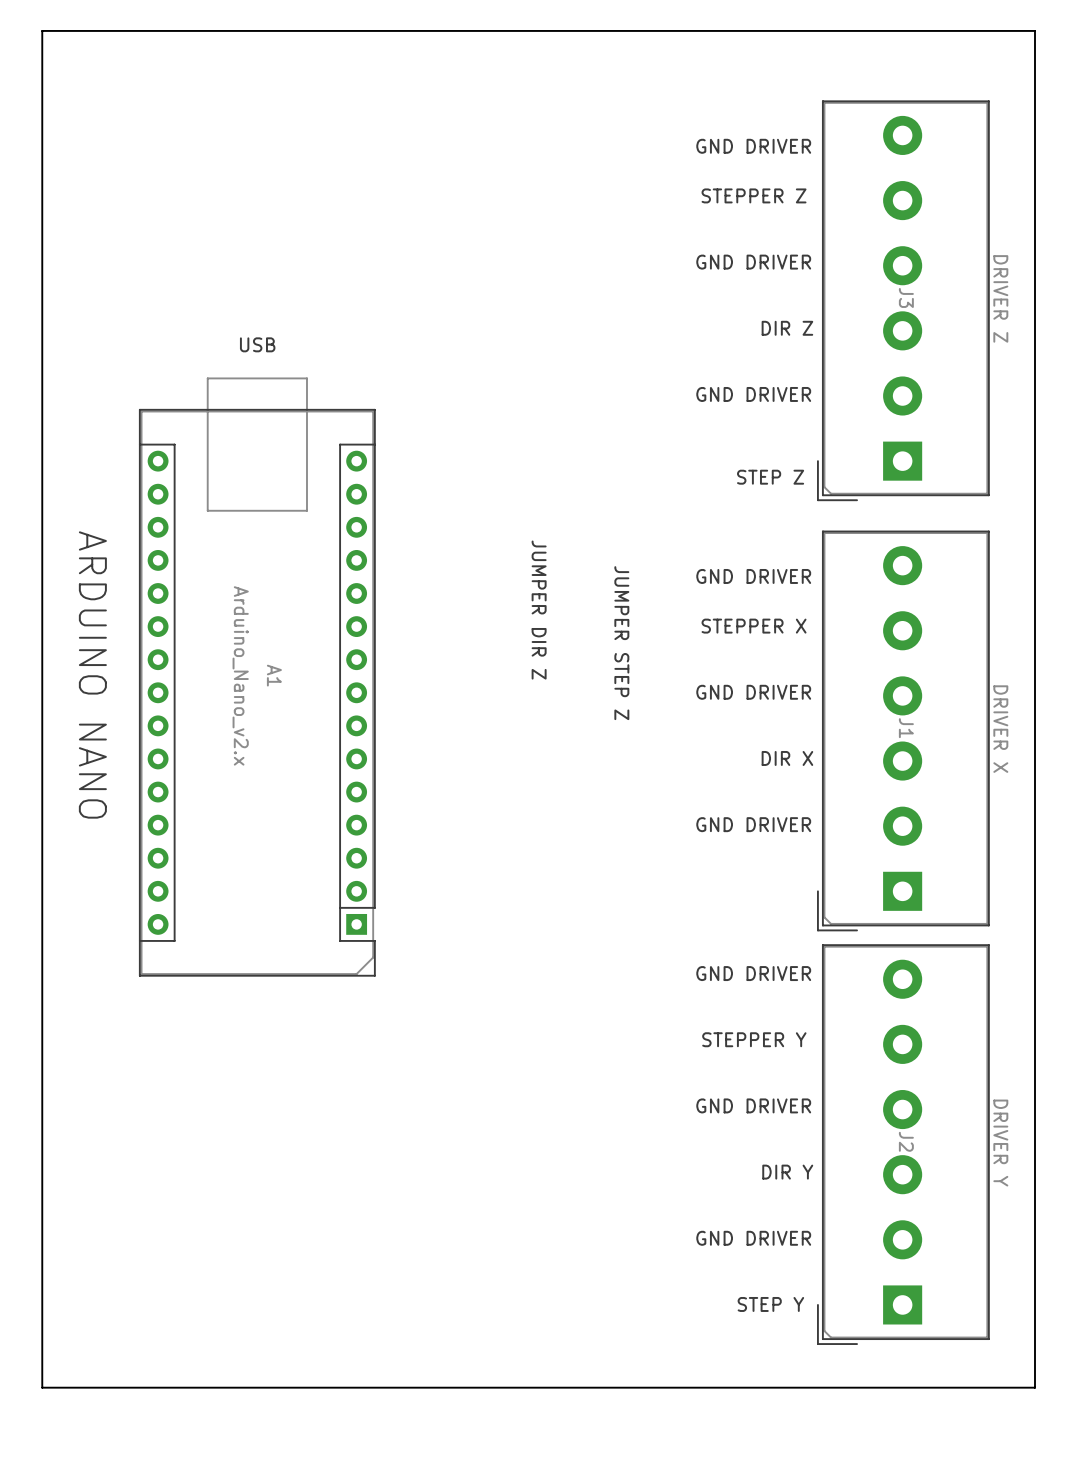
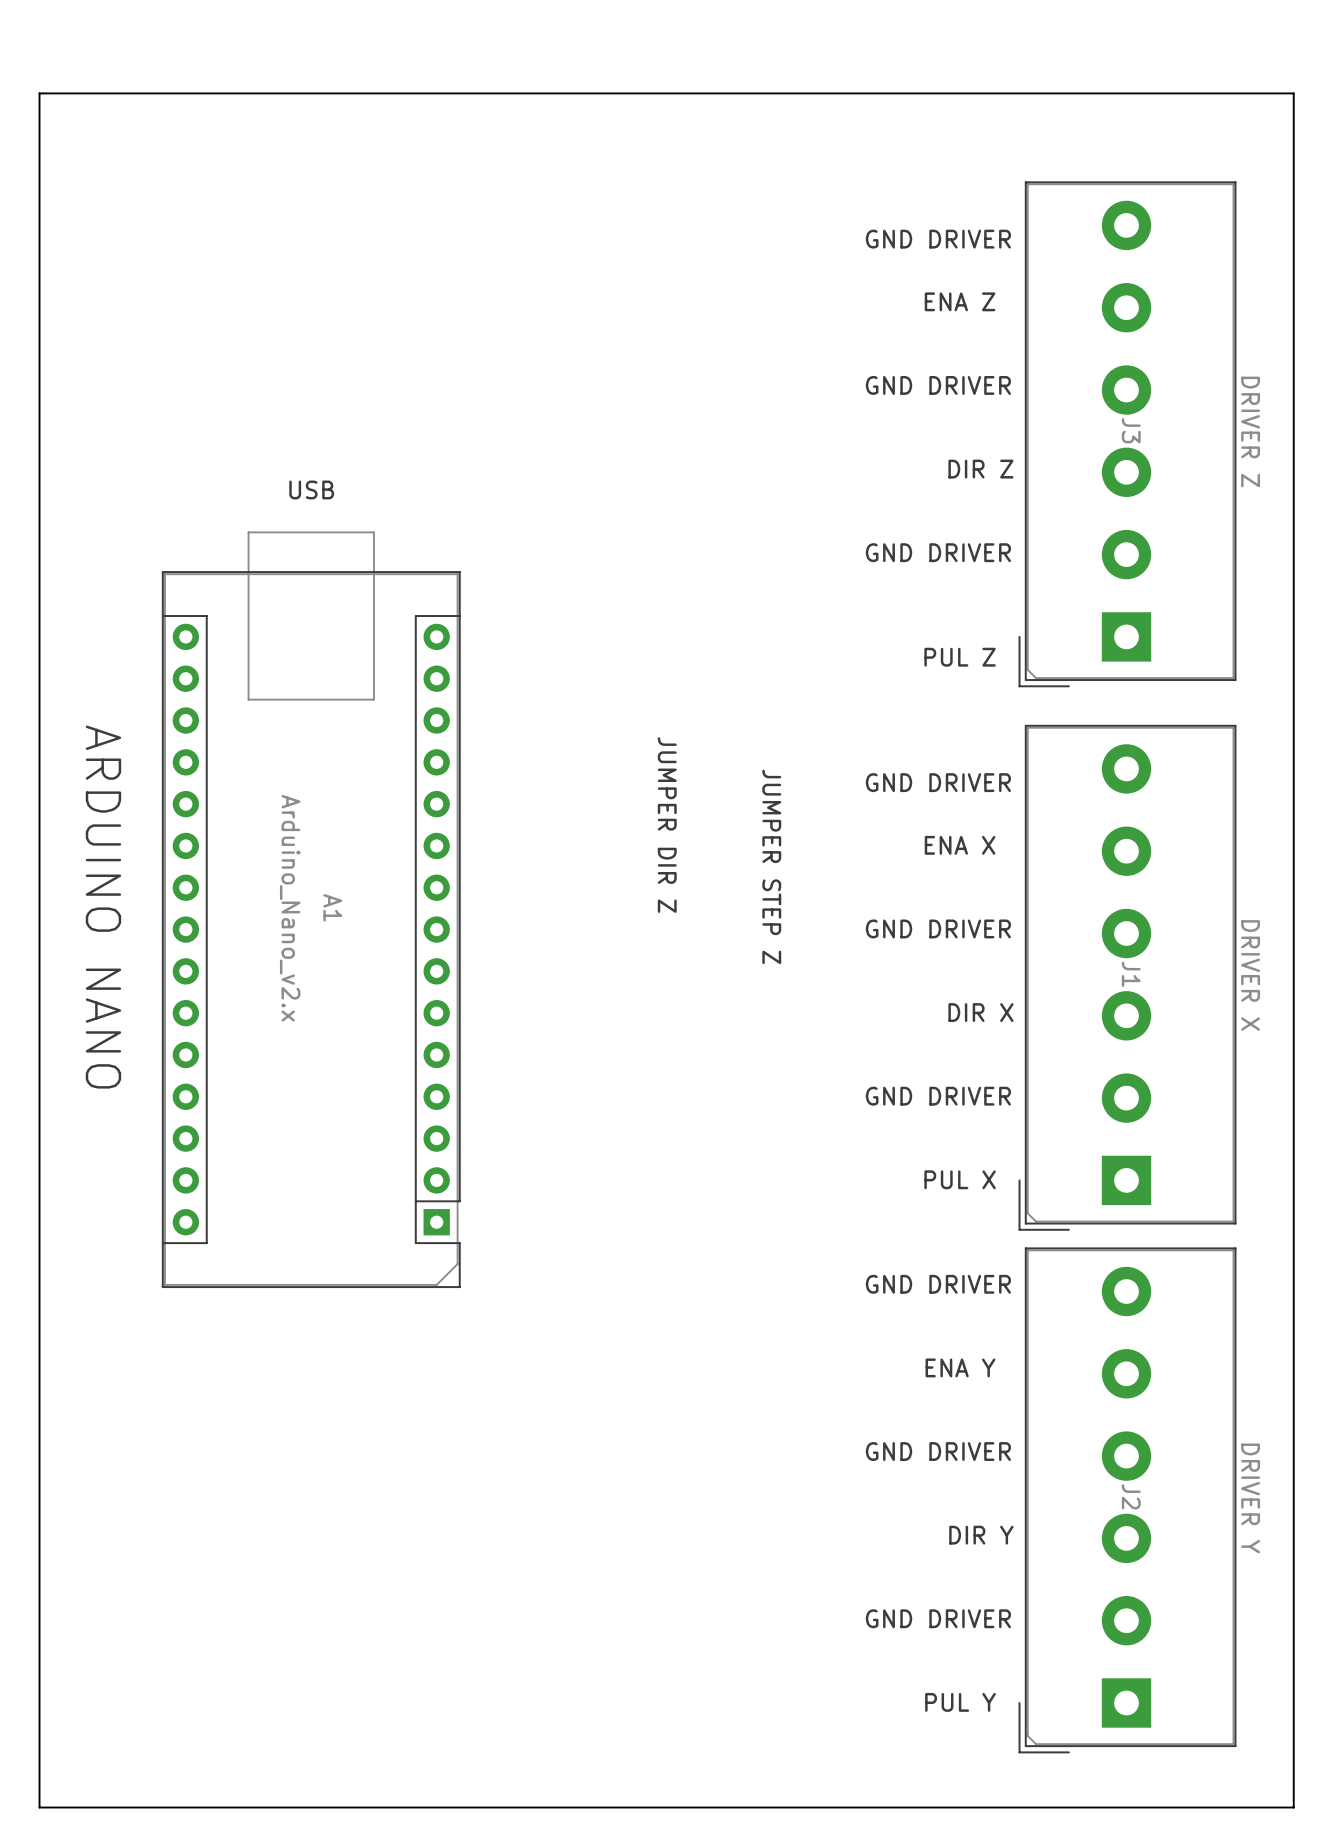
text: STEPPER Z (754, 195) -> none
text: none -> ENA Z (960, 301)
text: STEP Z (770, 477) -> PUL Z (960, 657)
text: STEPPER X (754, 626) -> none
text: none -> ENA X (960, 845)
text: none -> PUL X (960, 1179)
text: STEPPER Y (754, 1039) -> none
text: none -> ENA Y (960, 1367)
text: STEP Y (770, 1304) -> PUL Y (960, 1702)

